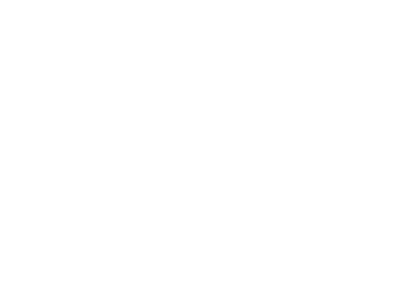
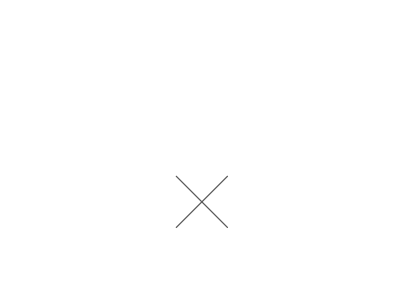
no-connect mark: none -> (201, 201)

